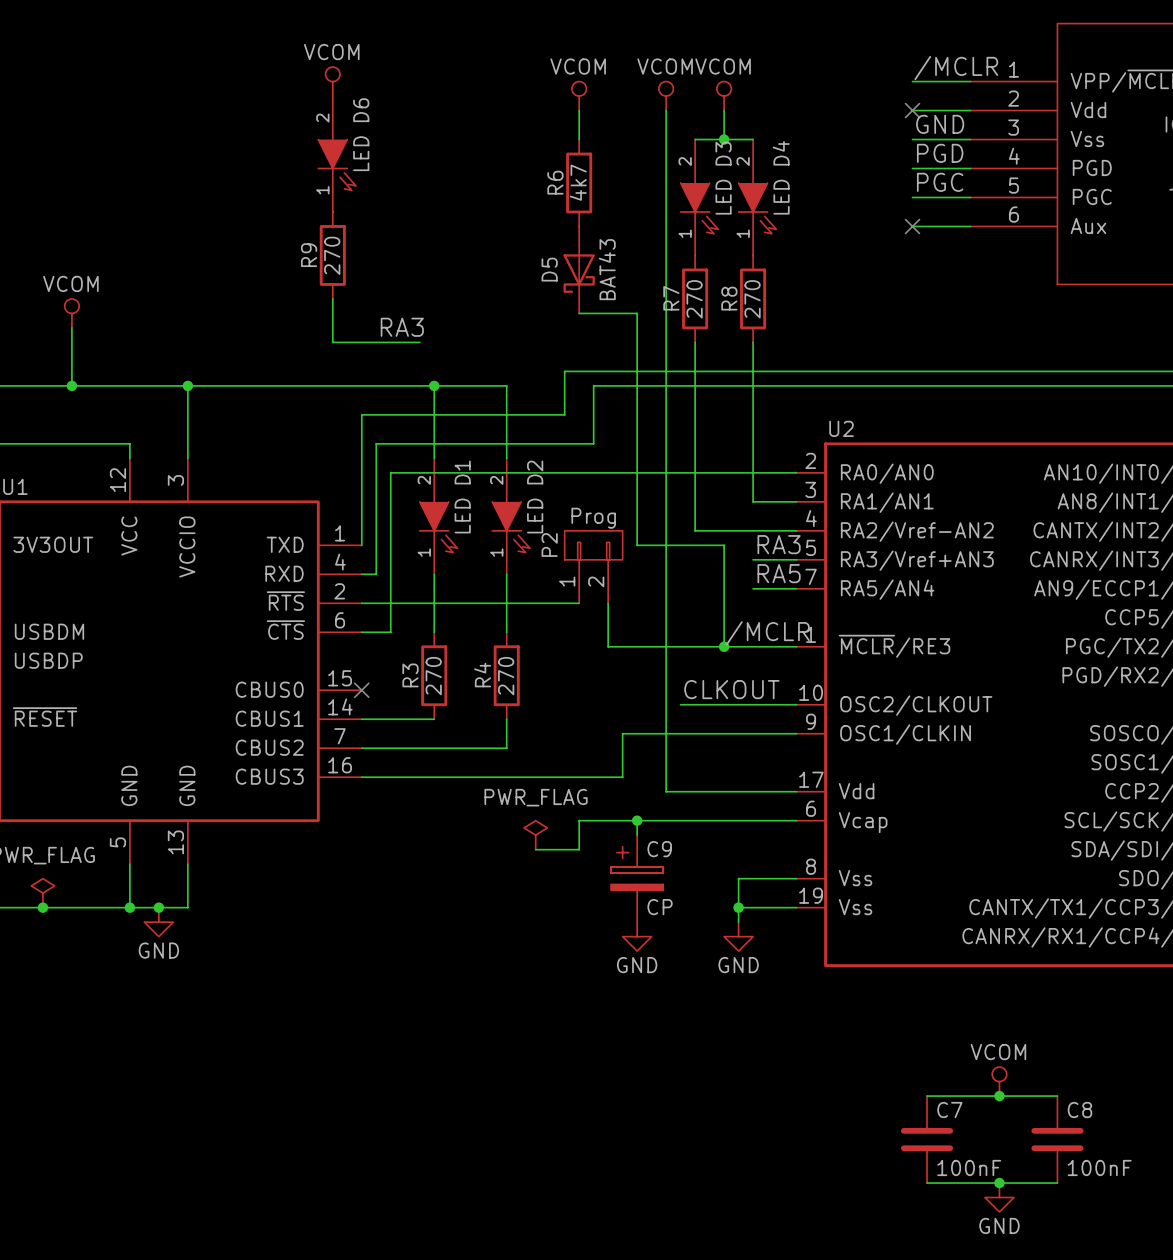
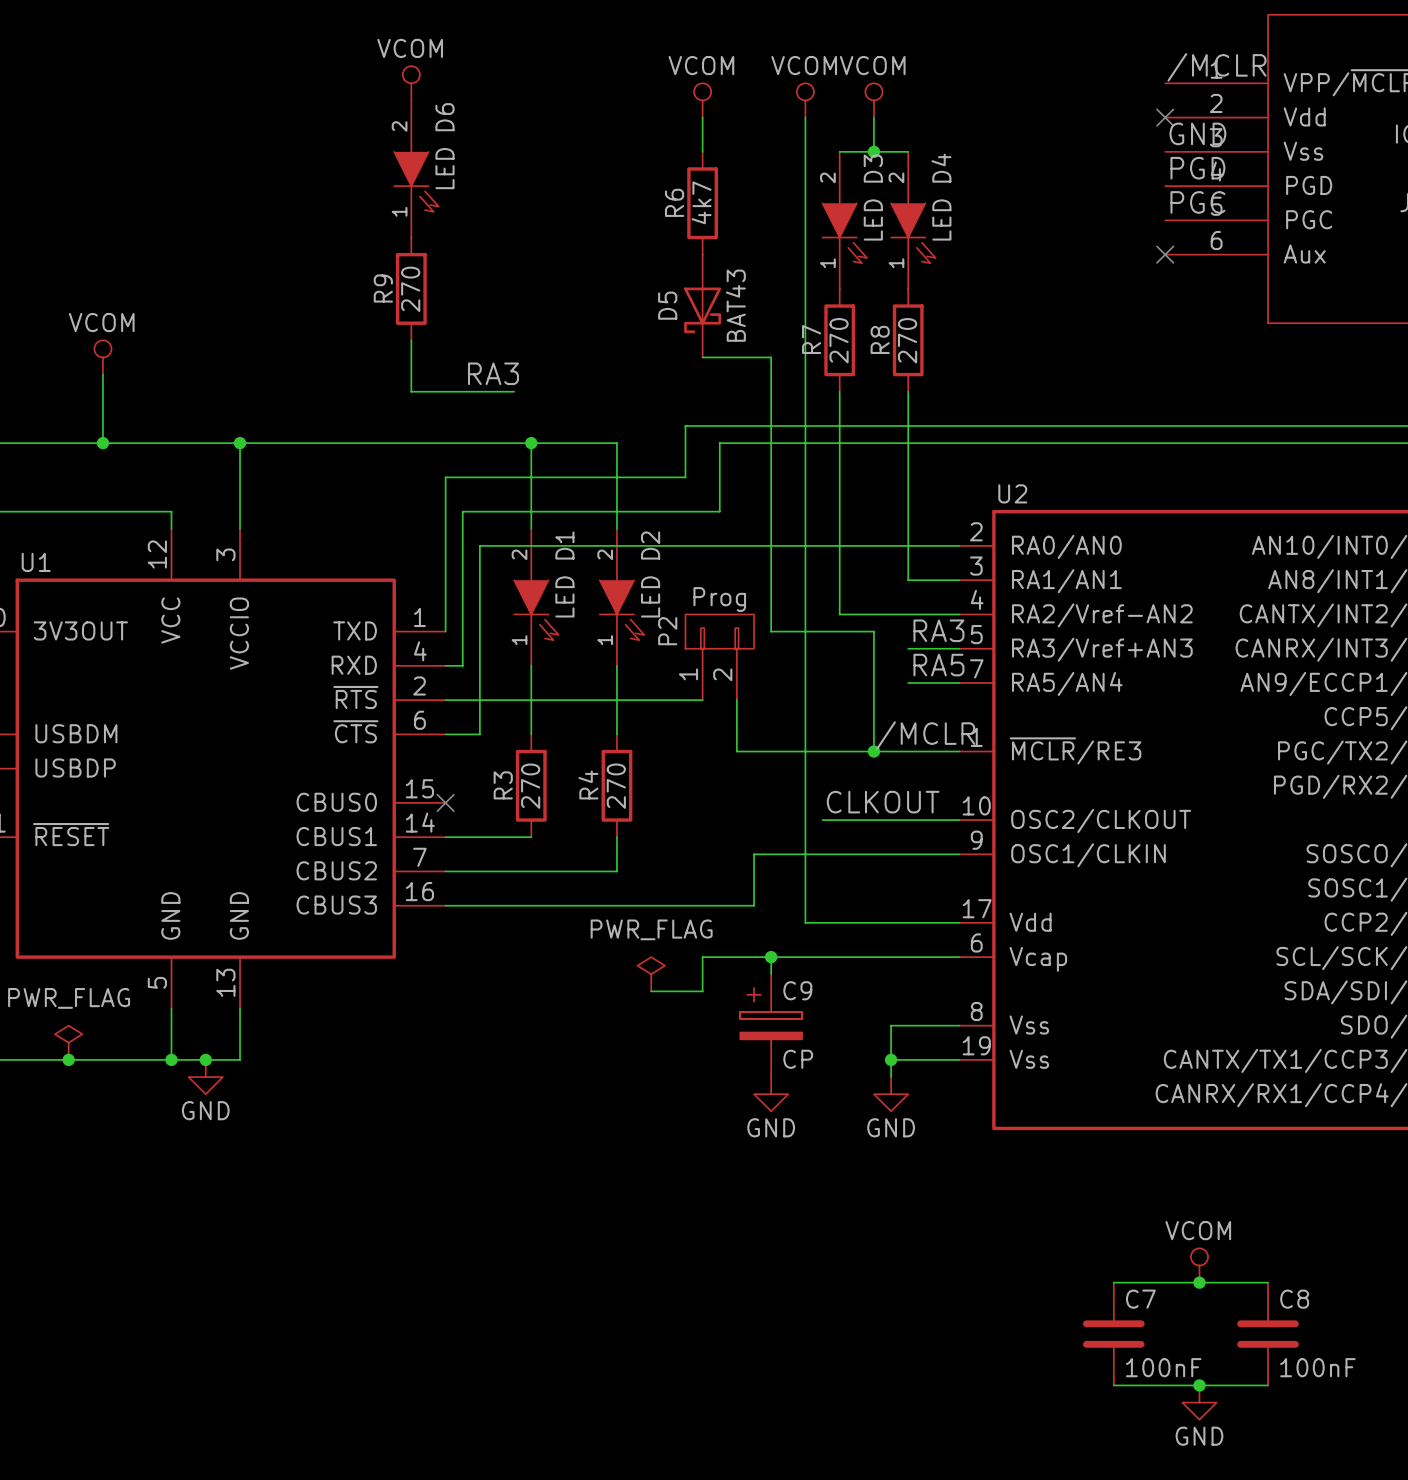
label position: /MCLR (956, 68) -> /MCLR (1216, 67)
wire: (912, 81) (970, 81) -> none
wire: (912, 110) (970, 110) -> none
no-connect mark position: (912, 110) -> (1165, 117)
label position: GND (940, 124) -> GND (1197, 133)
wire: (912, 139) (970, 139) -> none
label position: PGD (940, 153) -> PGD (1197, 168)
wire: (912, 168) (970, 168) -> none
label position: PGC (940, 182) -> PGC (1197, 202)
wire: (912, 197) (970, 197) -> none
wire: (912, 226) (970, 226) -> none
no-connect mark position: (912, 226) -> (1165, 254)

